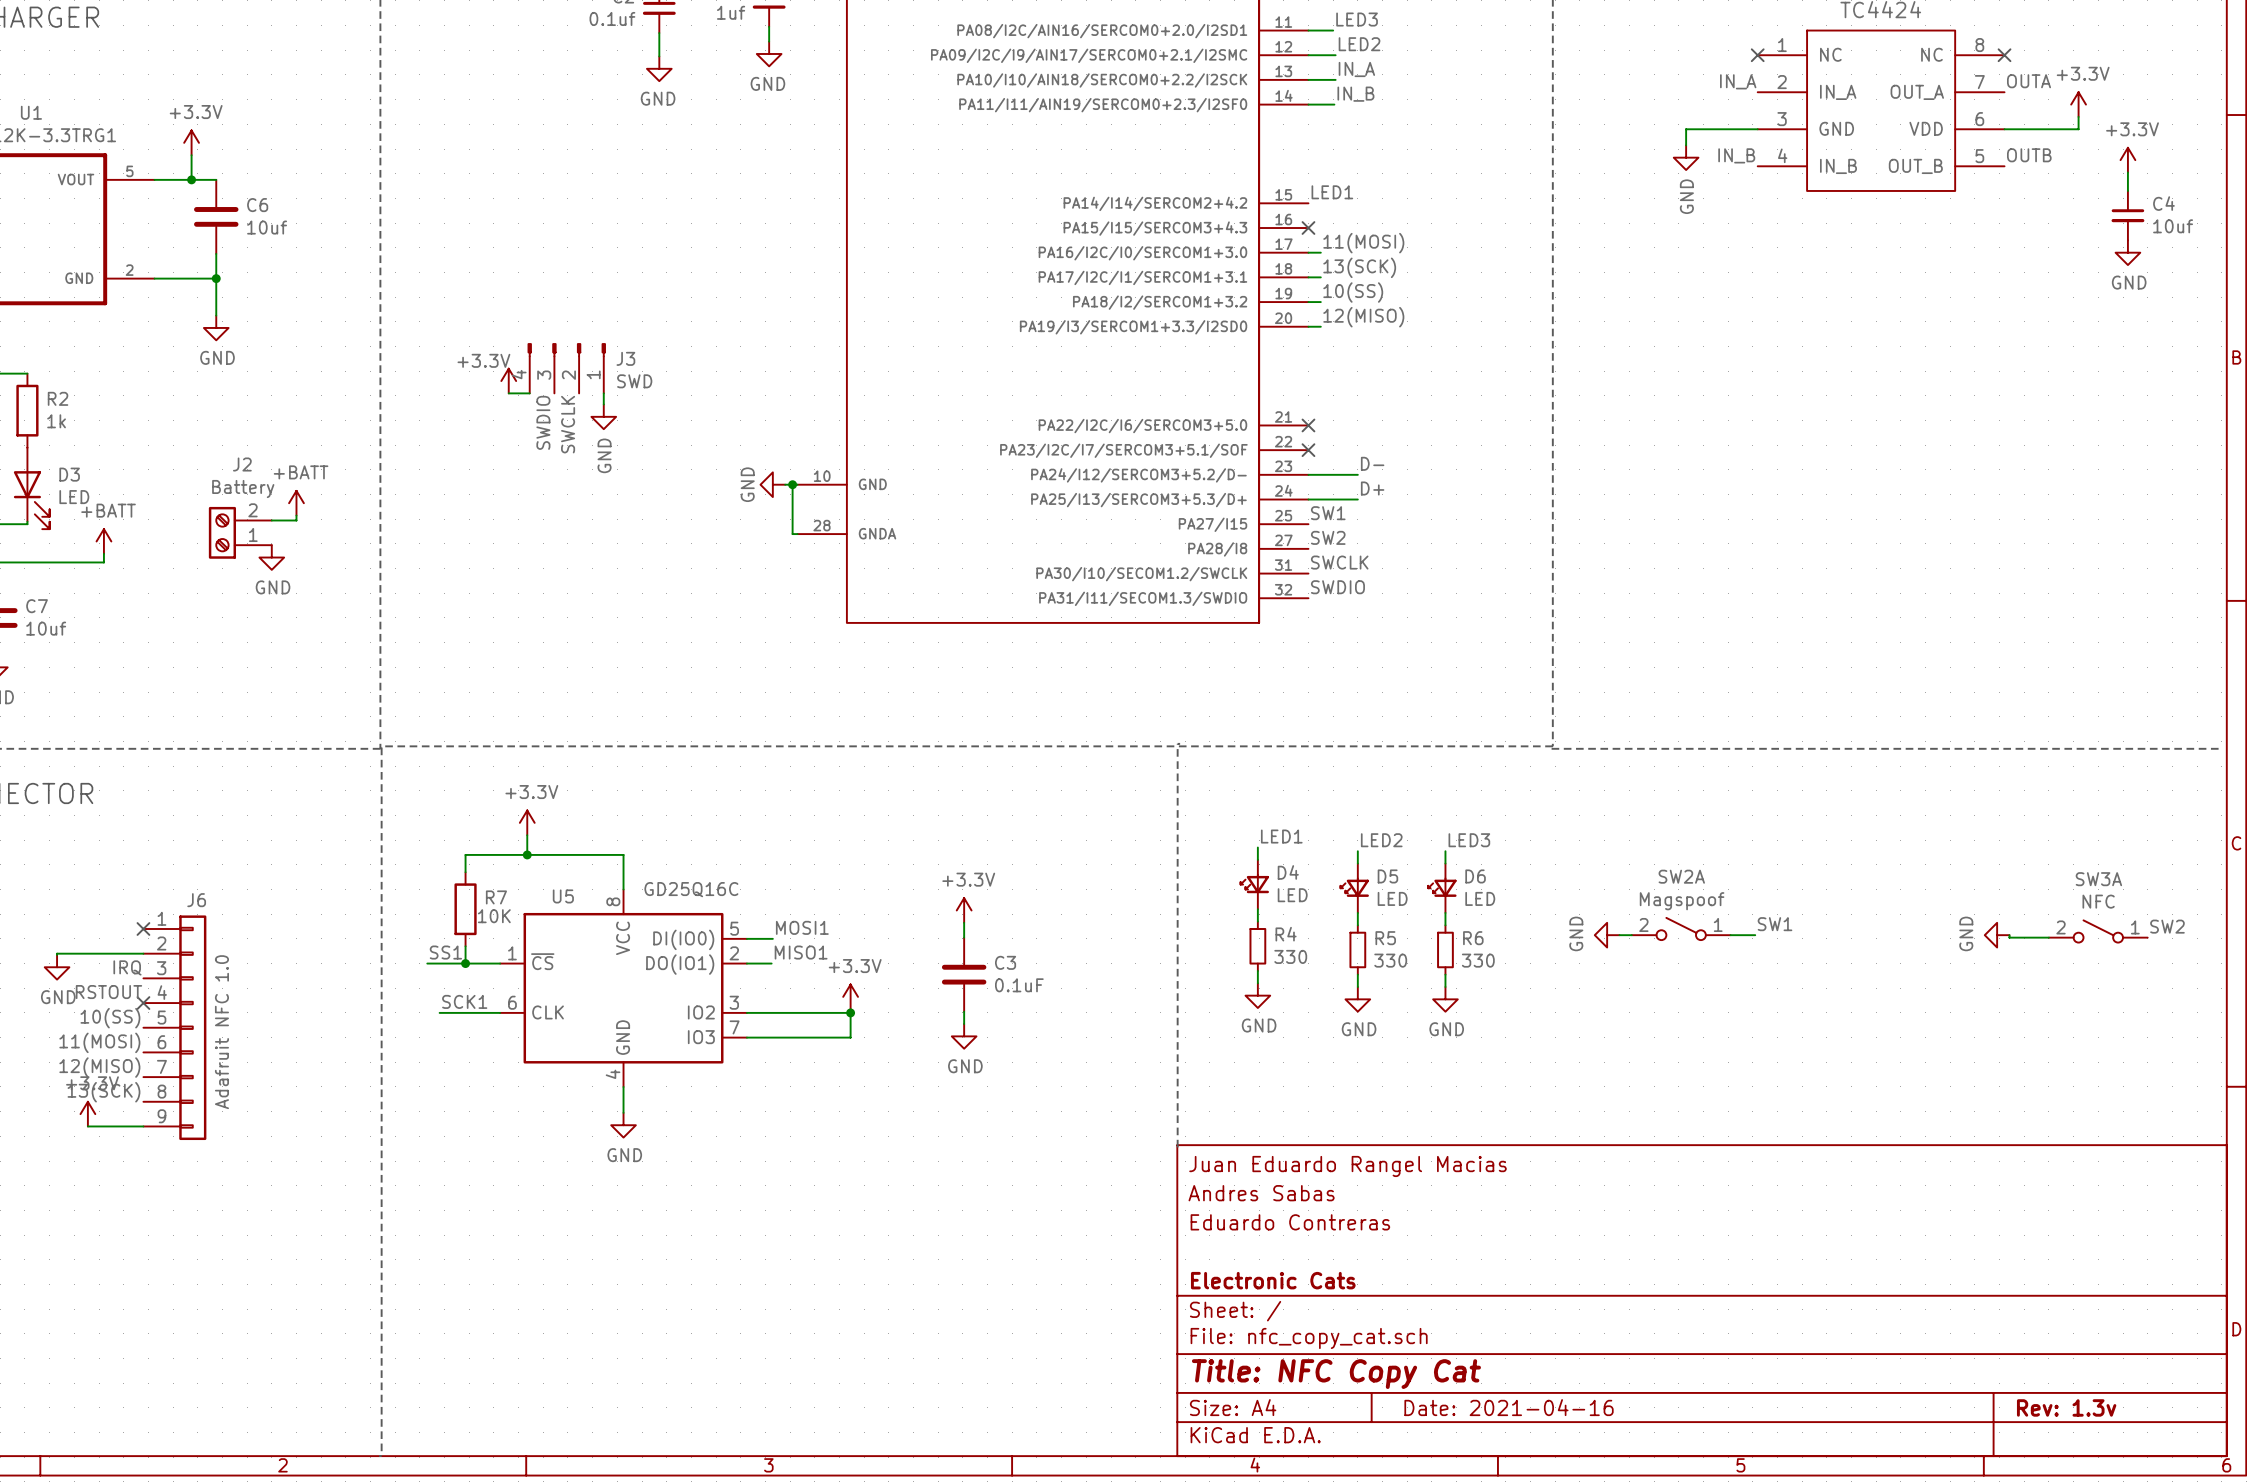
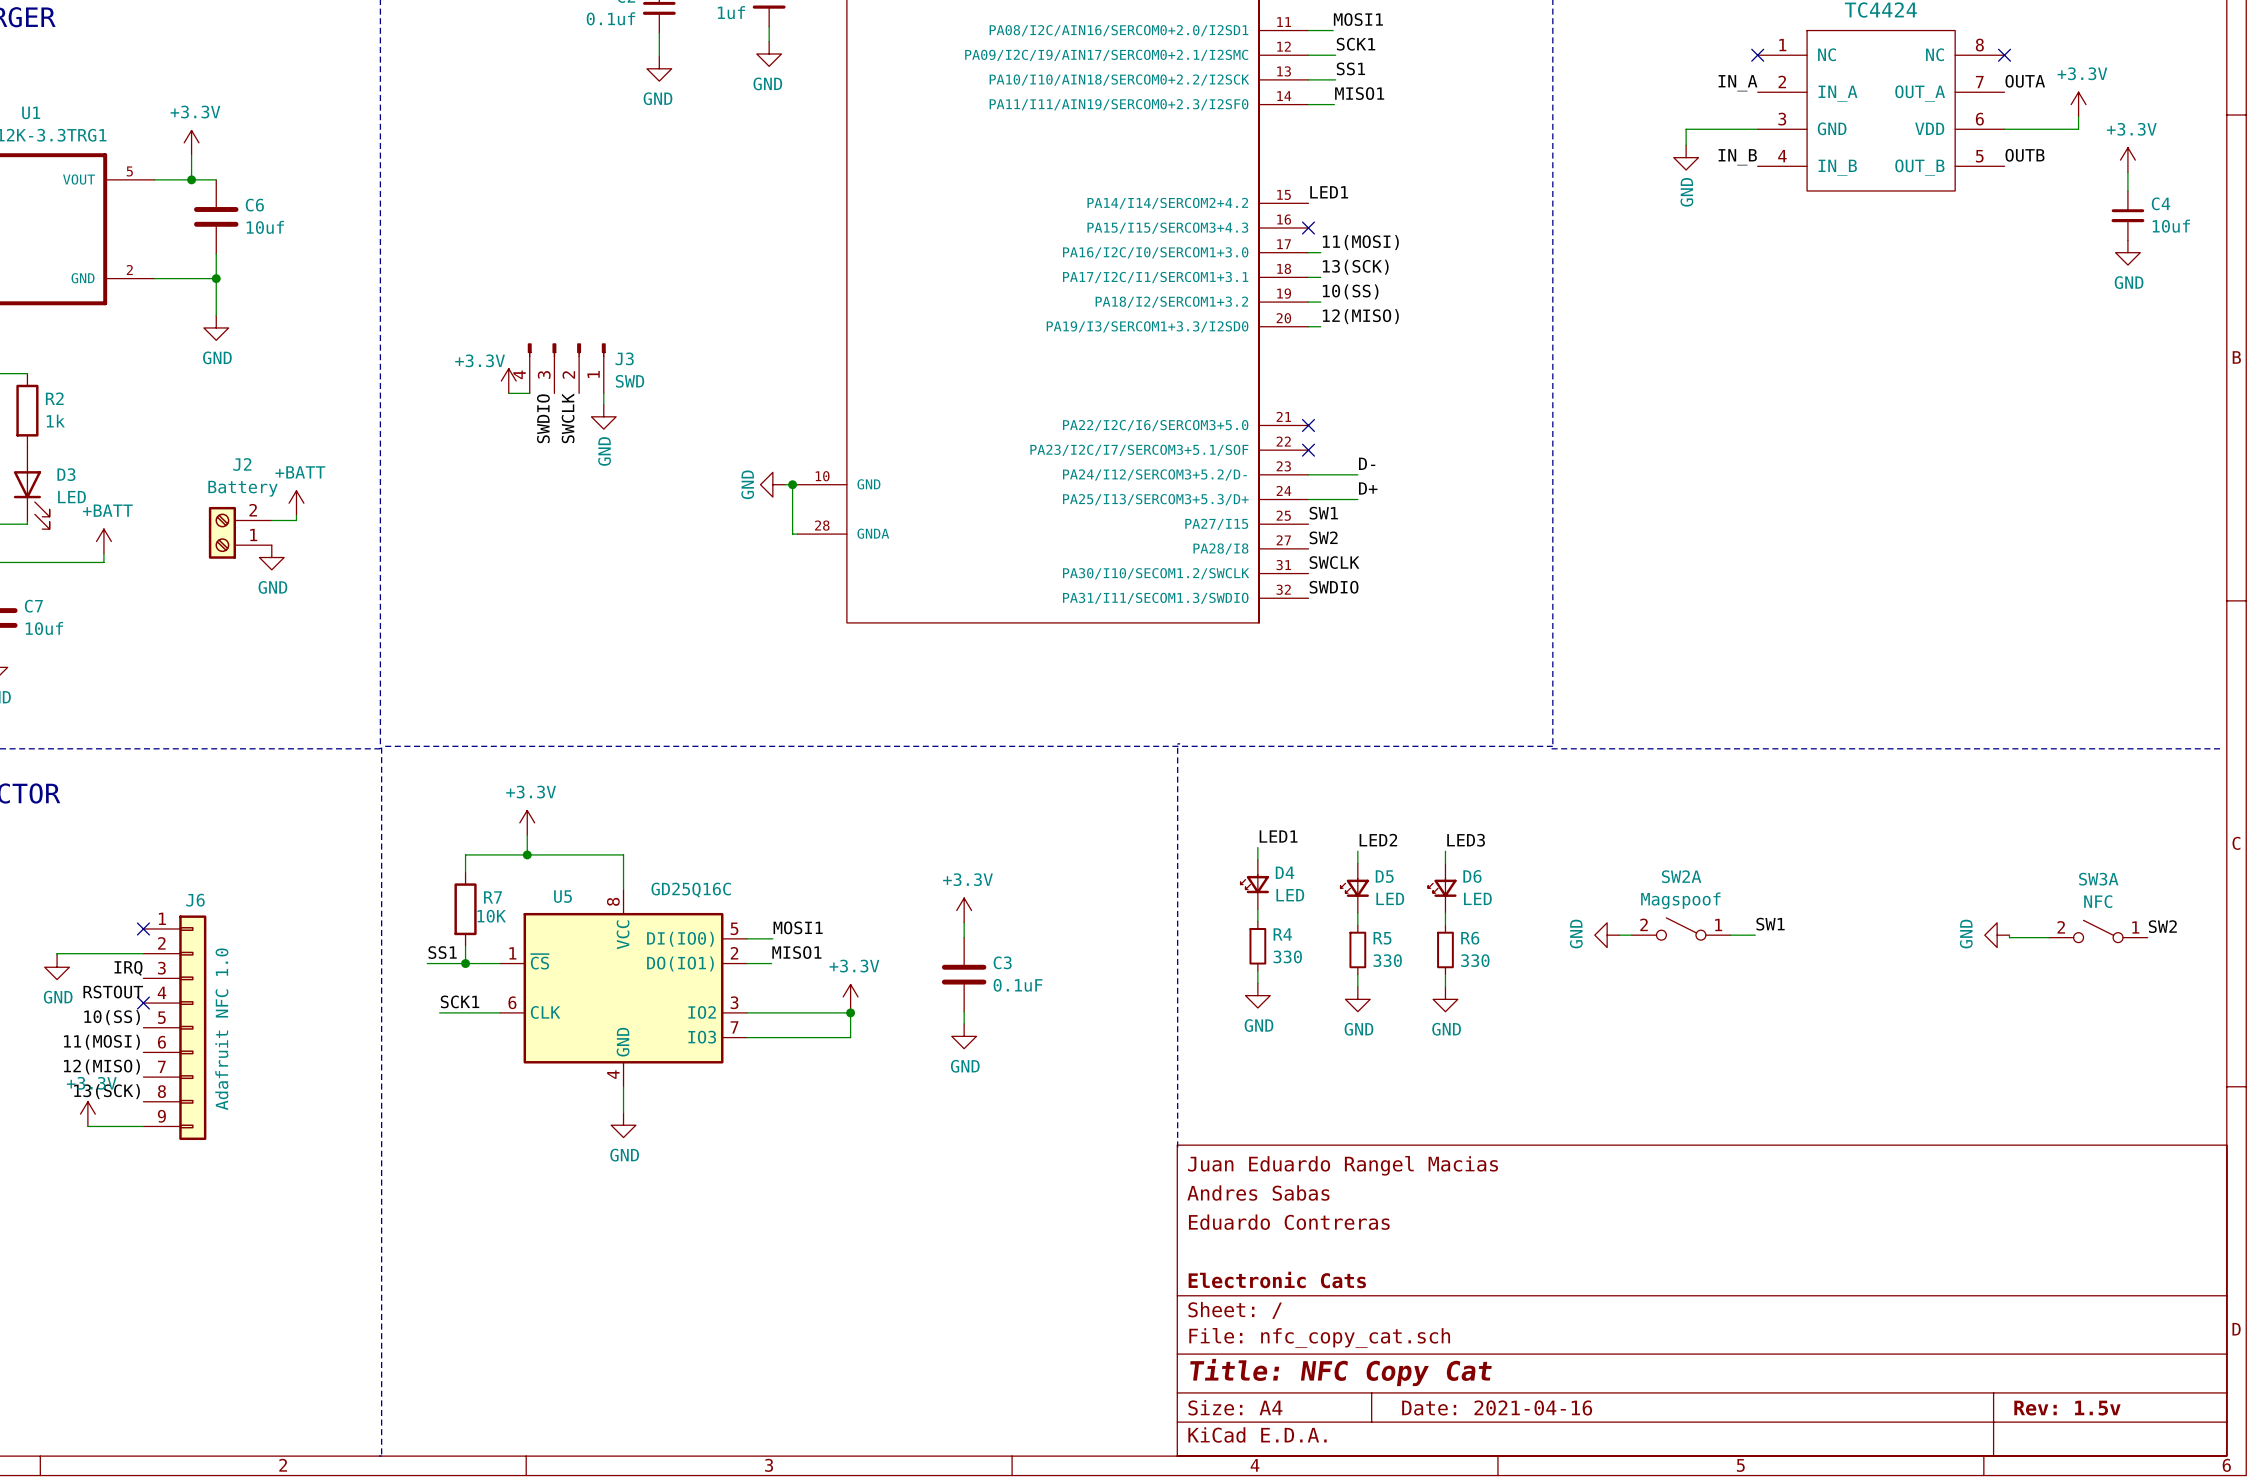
label: LED3 (1357, 19) -> MOSI1 (1358, 19)
label: LED2 (1359, 44) -> SCK1 (1356, 44)
label: IN_A (1356, 69) -> SS1 (1350, 68)
label: IN_B (1355, 94) -> MISO1 (1359, 93)
title block: Rev: 1.3v (2066, 1407) -> Rev: 1.5v (2067, 1408)

